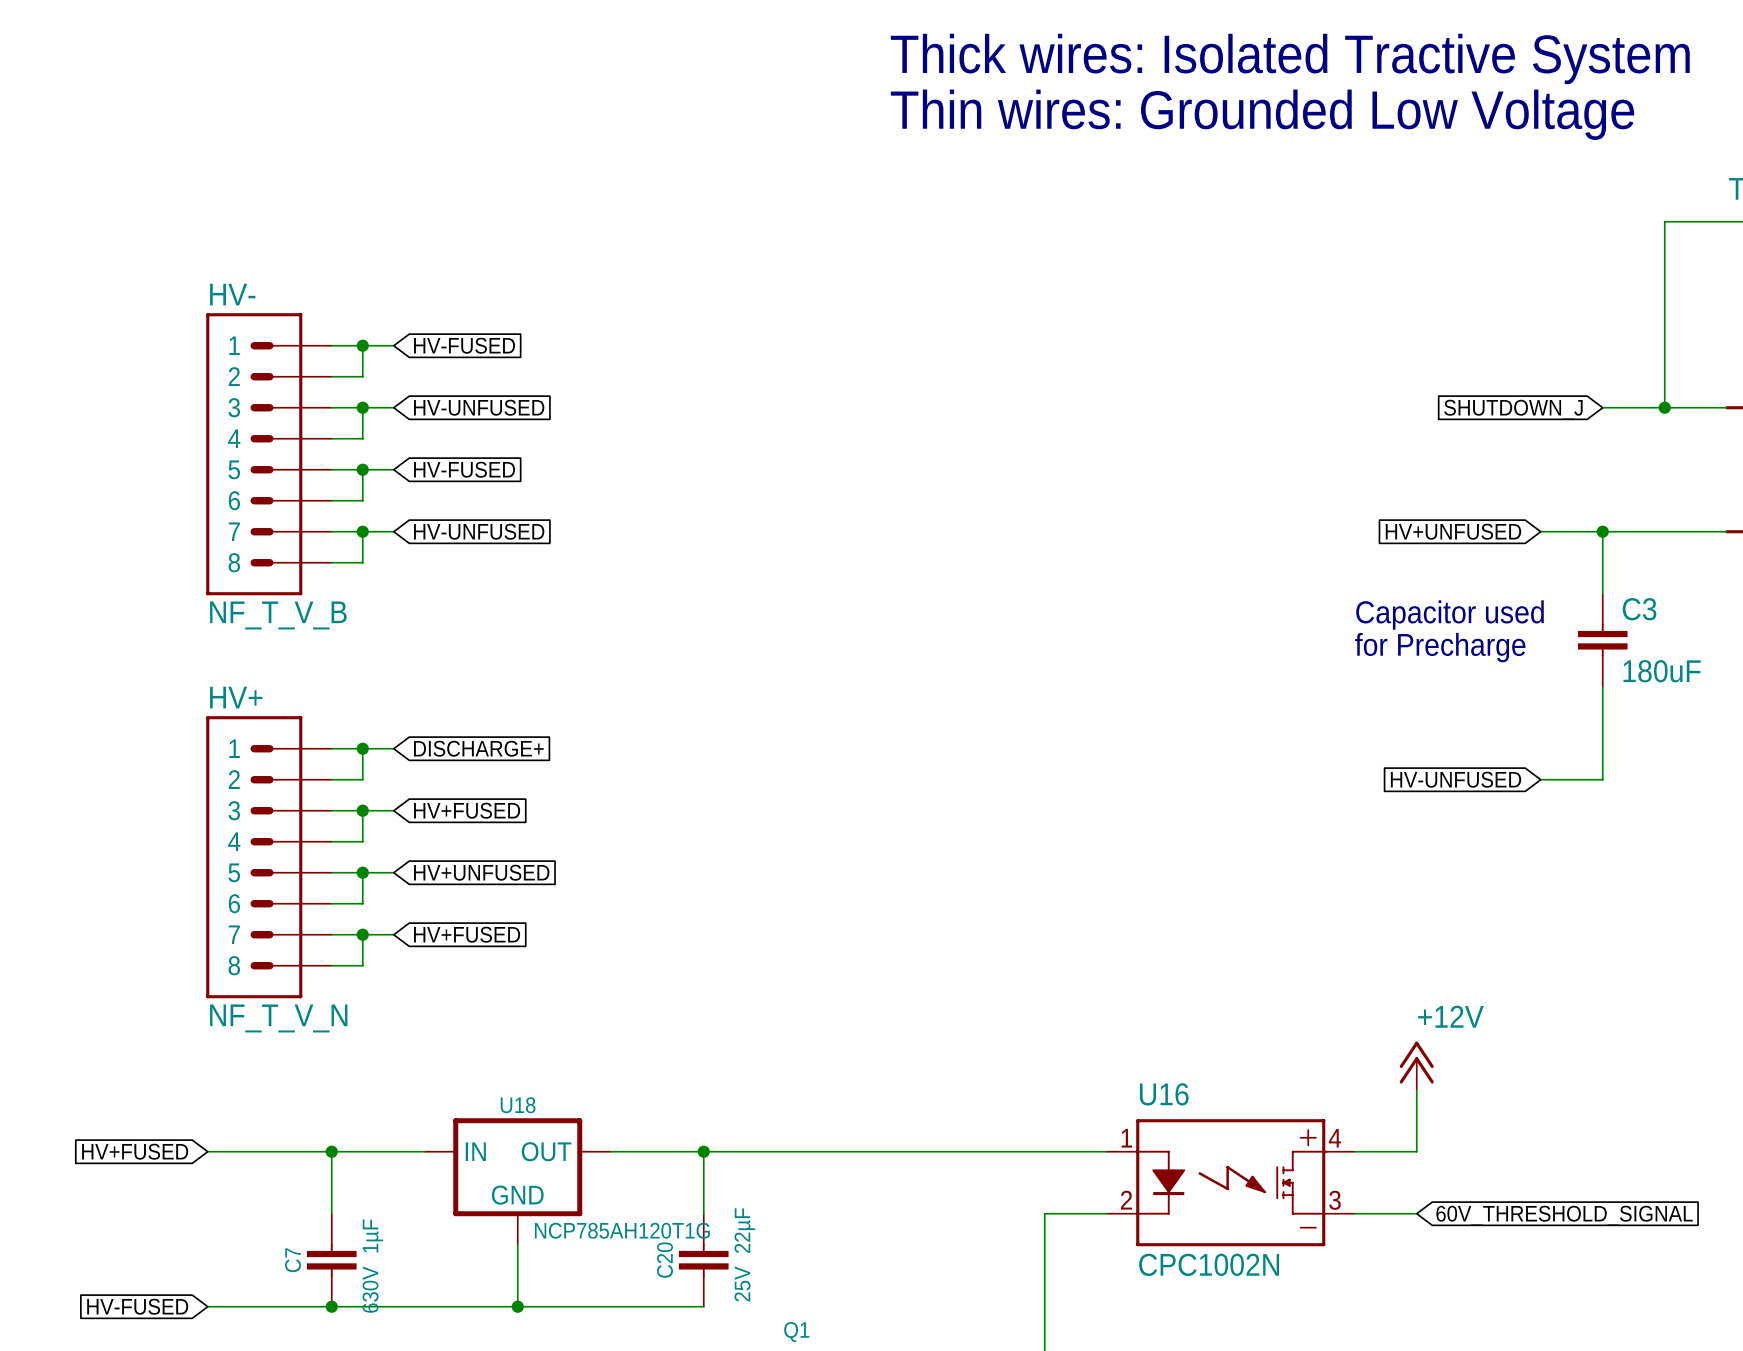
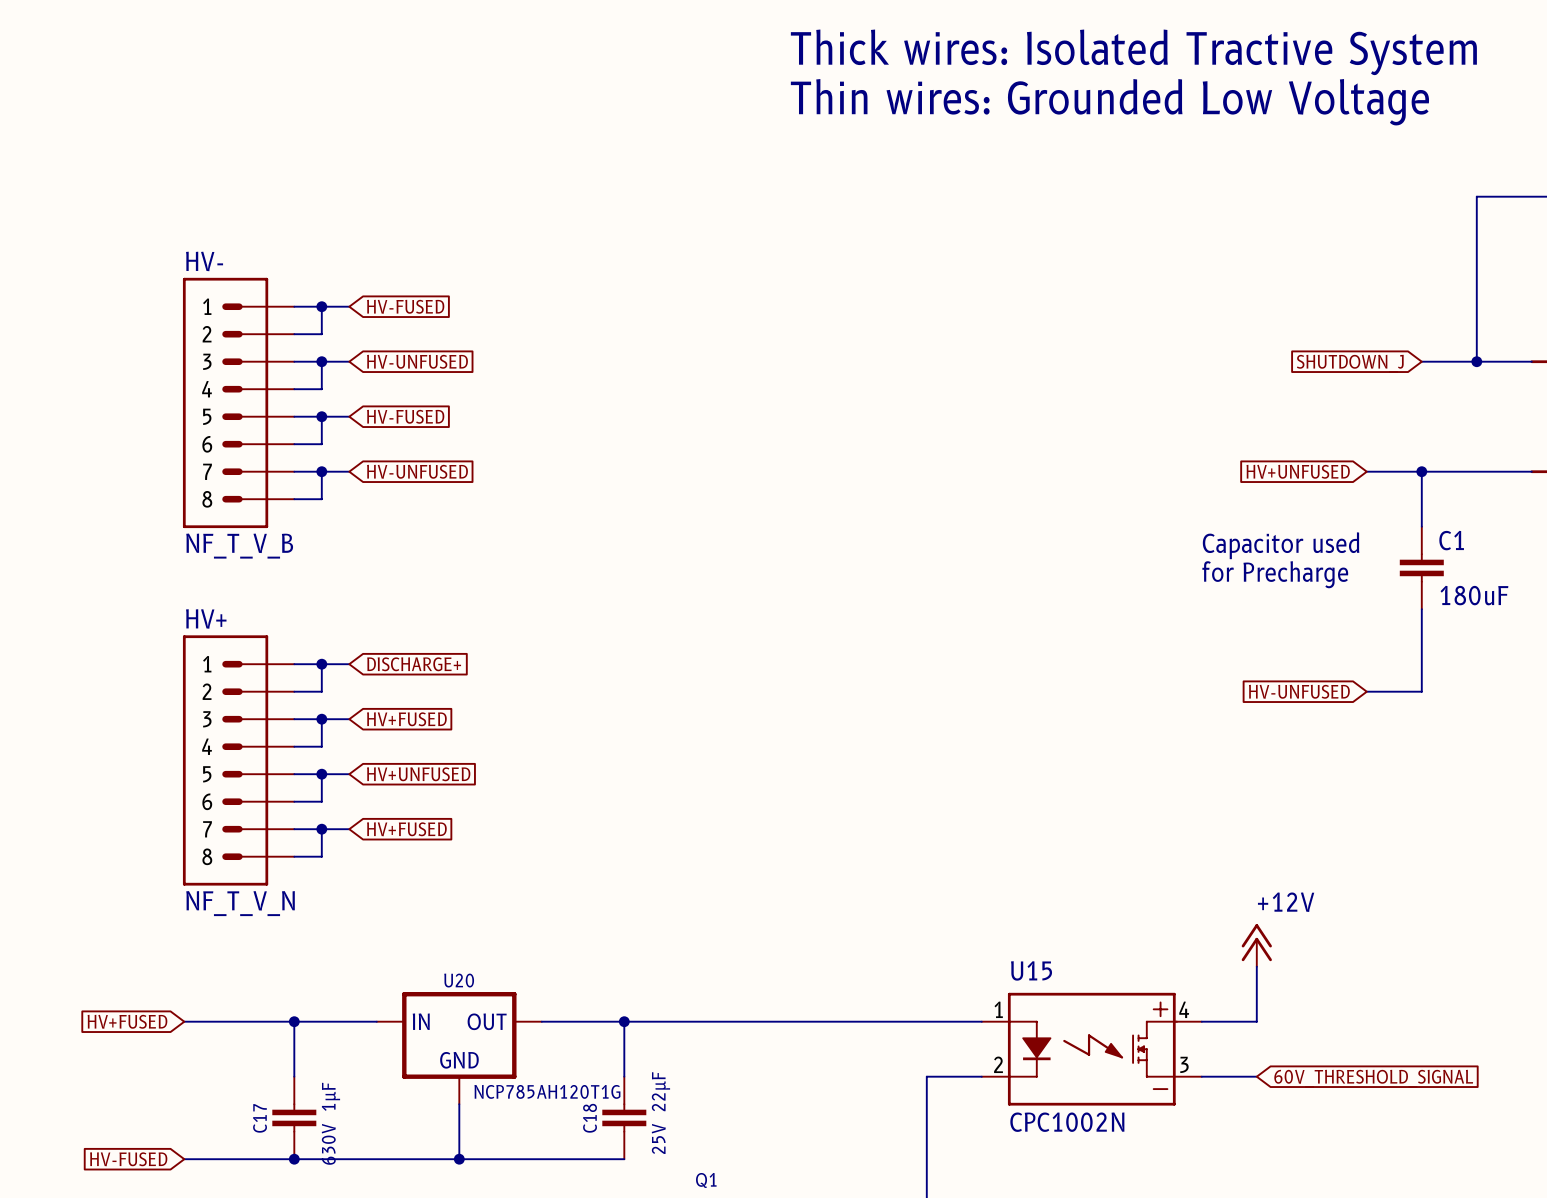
C3 name: C3 (1639, 609) -> C1 (1451, 540)
U16 name: U16 (1164, 1094) -> U15 (1031, 970)
U18 name: U18 (518, 1105) -> U20 (459, 980)
C7 name: C7 (293, 1260) -> C17 (260, 1118)
C20 name: C20 (665, 1260) -> C18 (590, 1118)

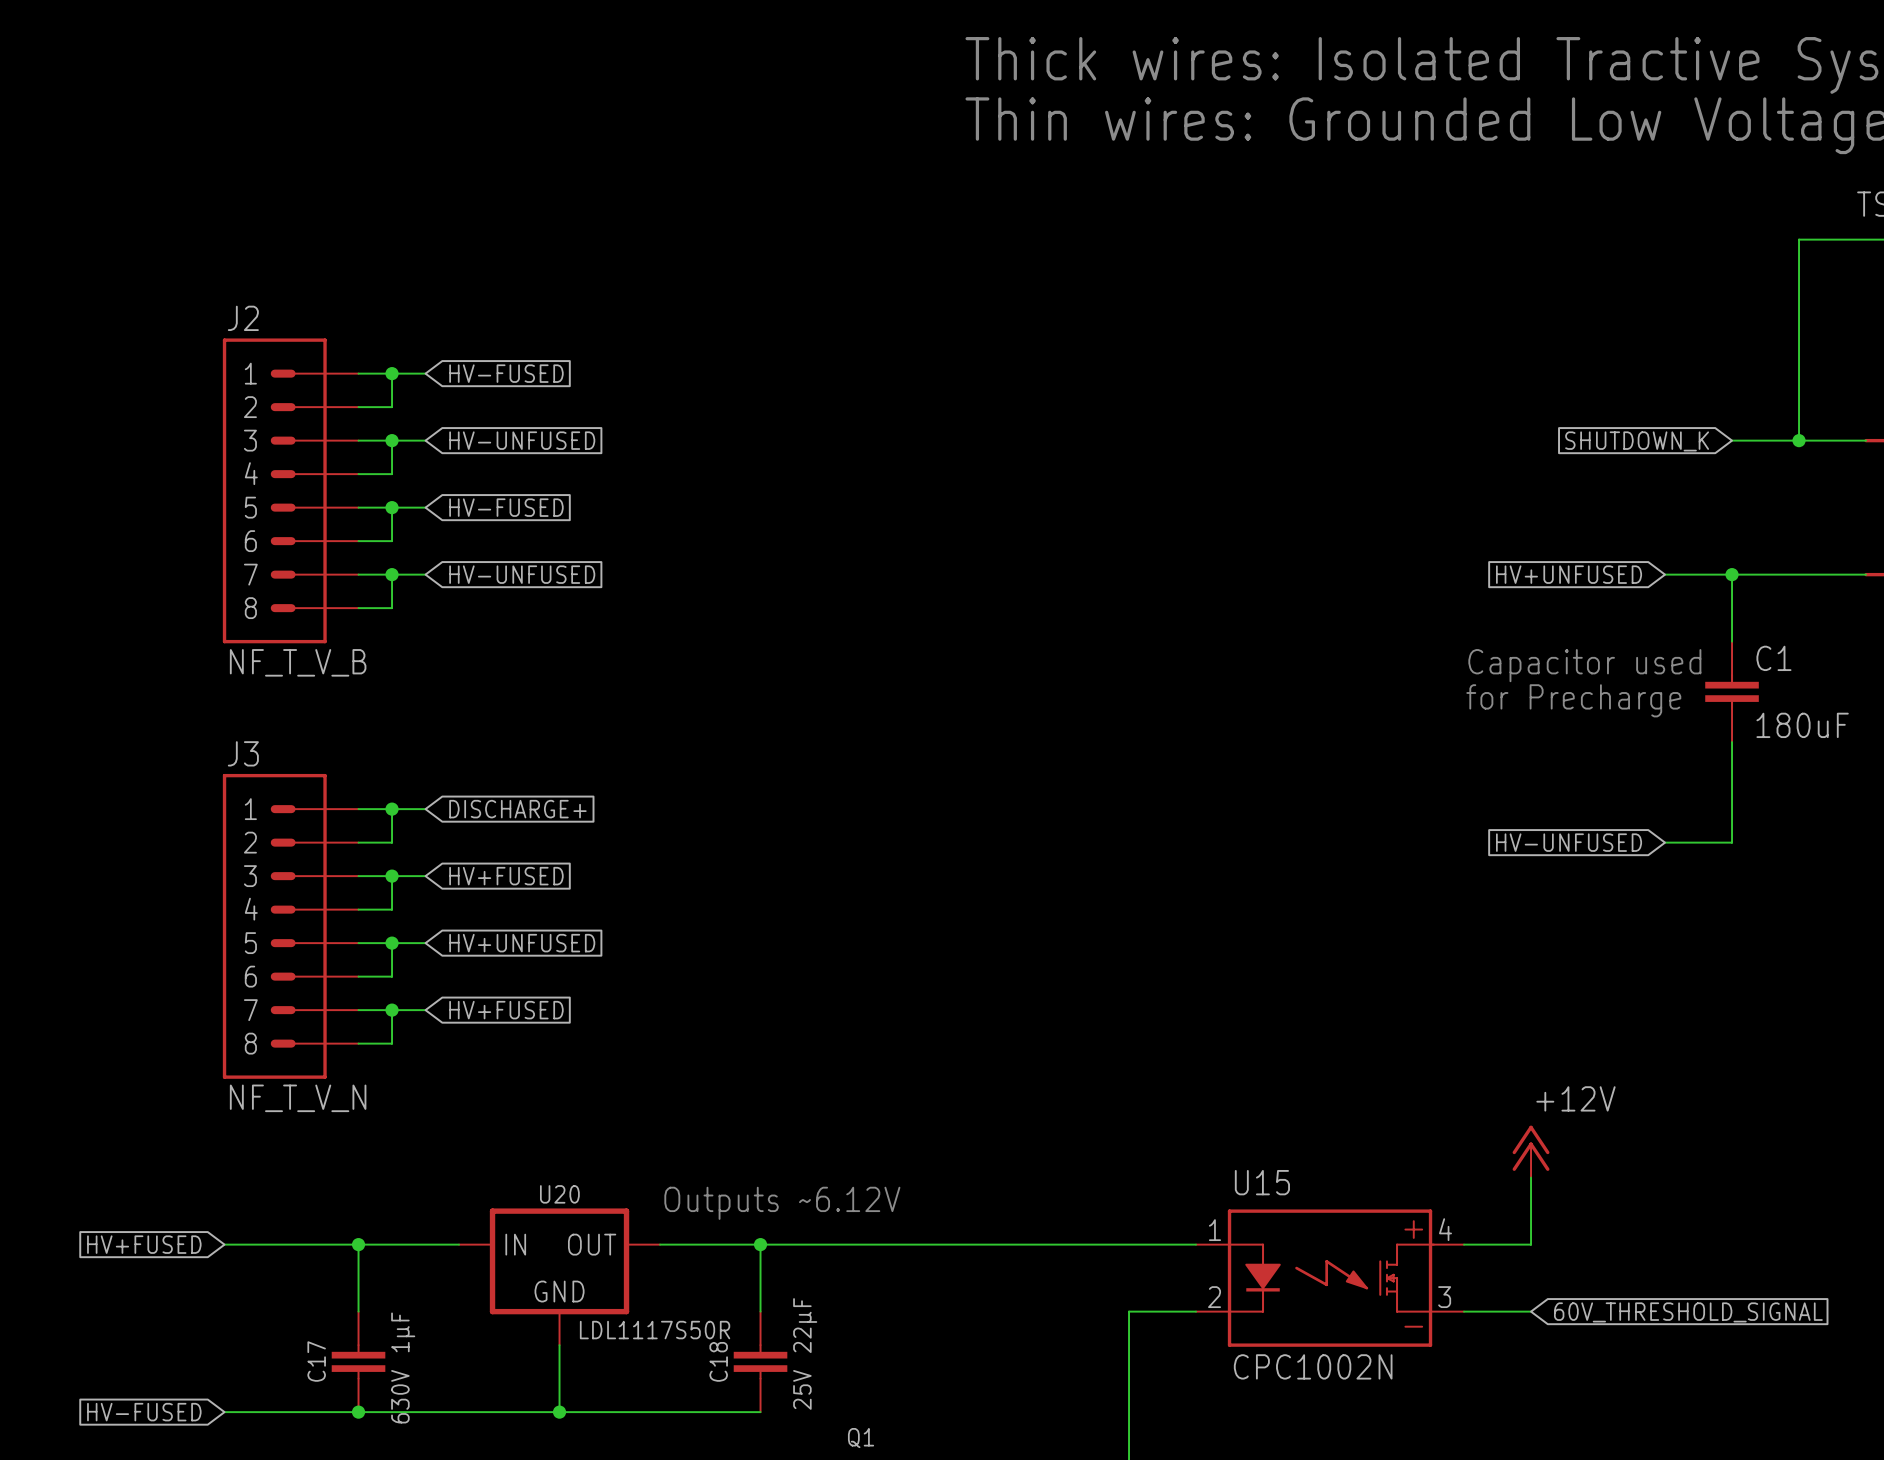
HV- name: HV- (204, 261) -> J2 (243, 318)
global label: SHUTDOWN_J (1350, 363) -> SHUTDOWN_K (1637, 441)
HV+ name: HV+ (206, 618) -> J3 (243, 753)
text: none -> Outputs ~6.12V (782, 1203)
U20 text: NCP785AH120T1G (547, 1091) -> LDL1117S50R (655, 1330)

